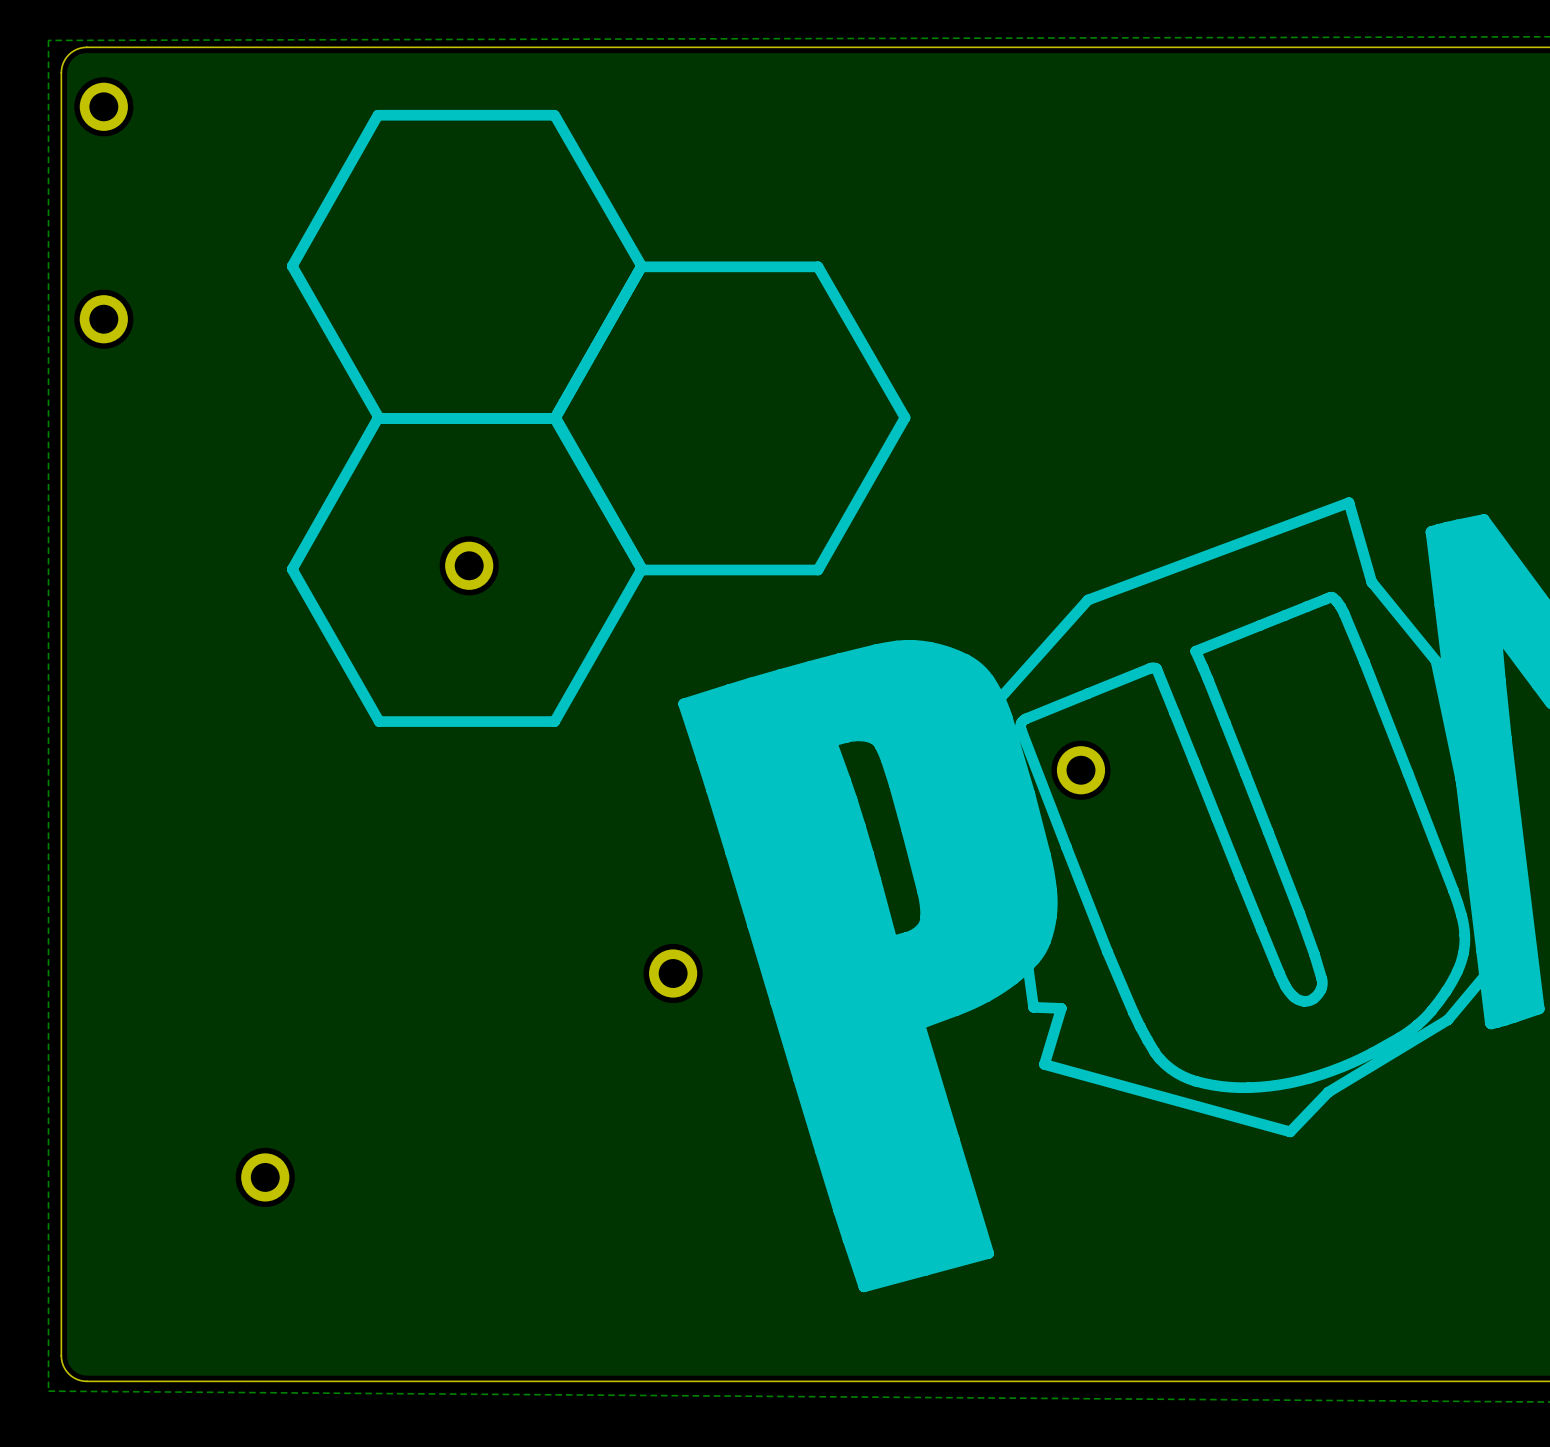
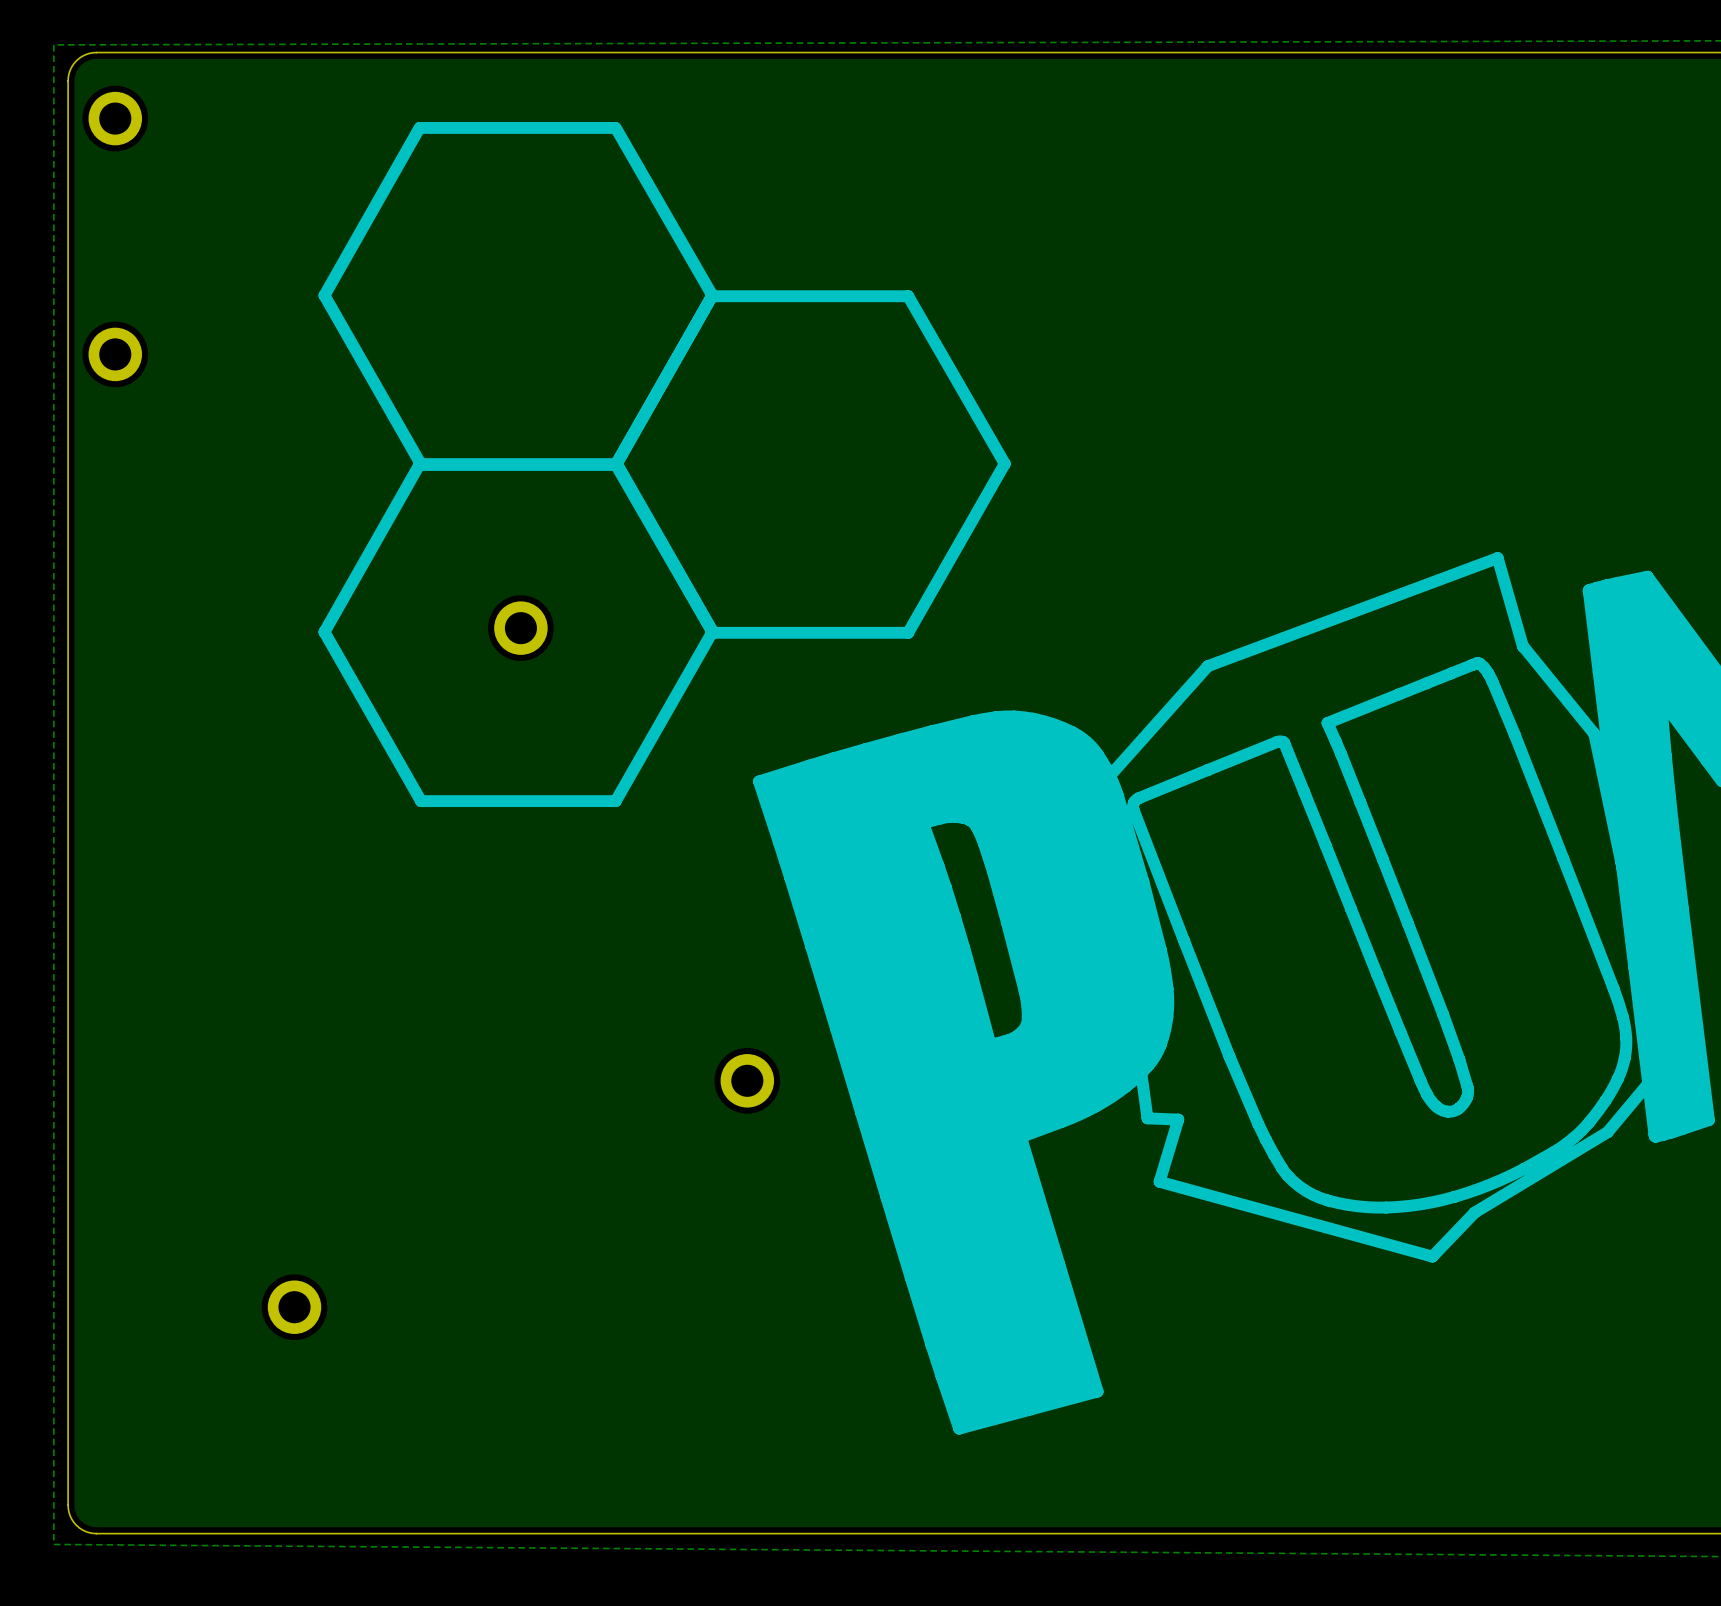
part: (1080, 770) -> none

